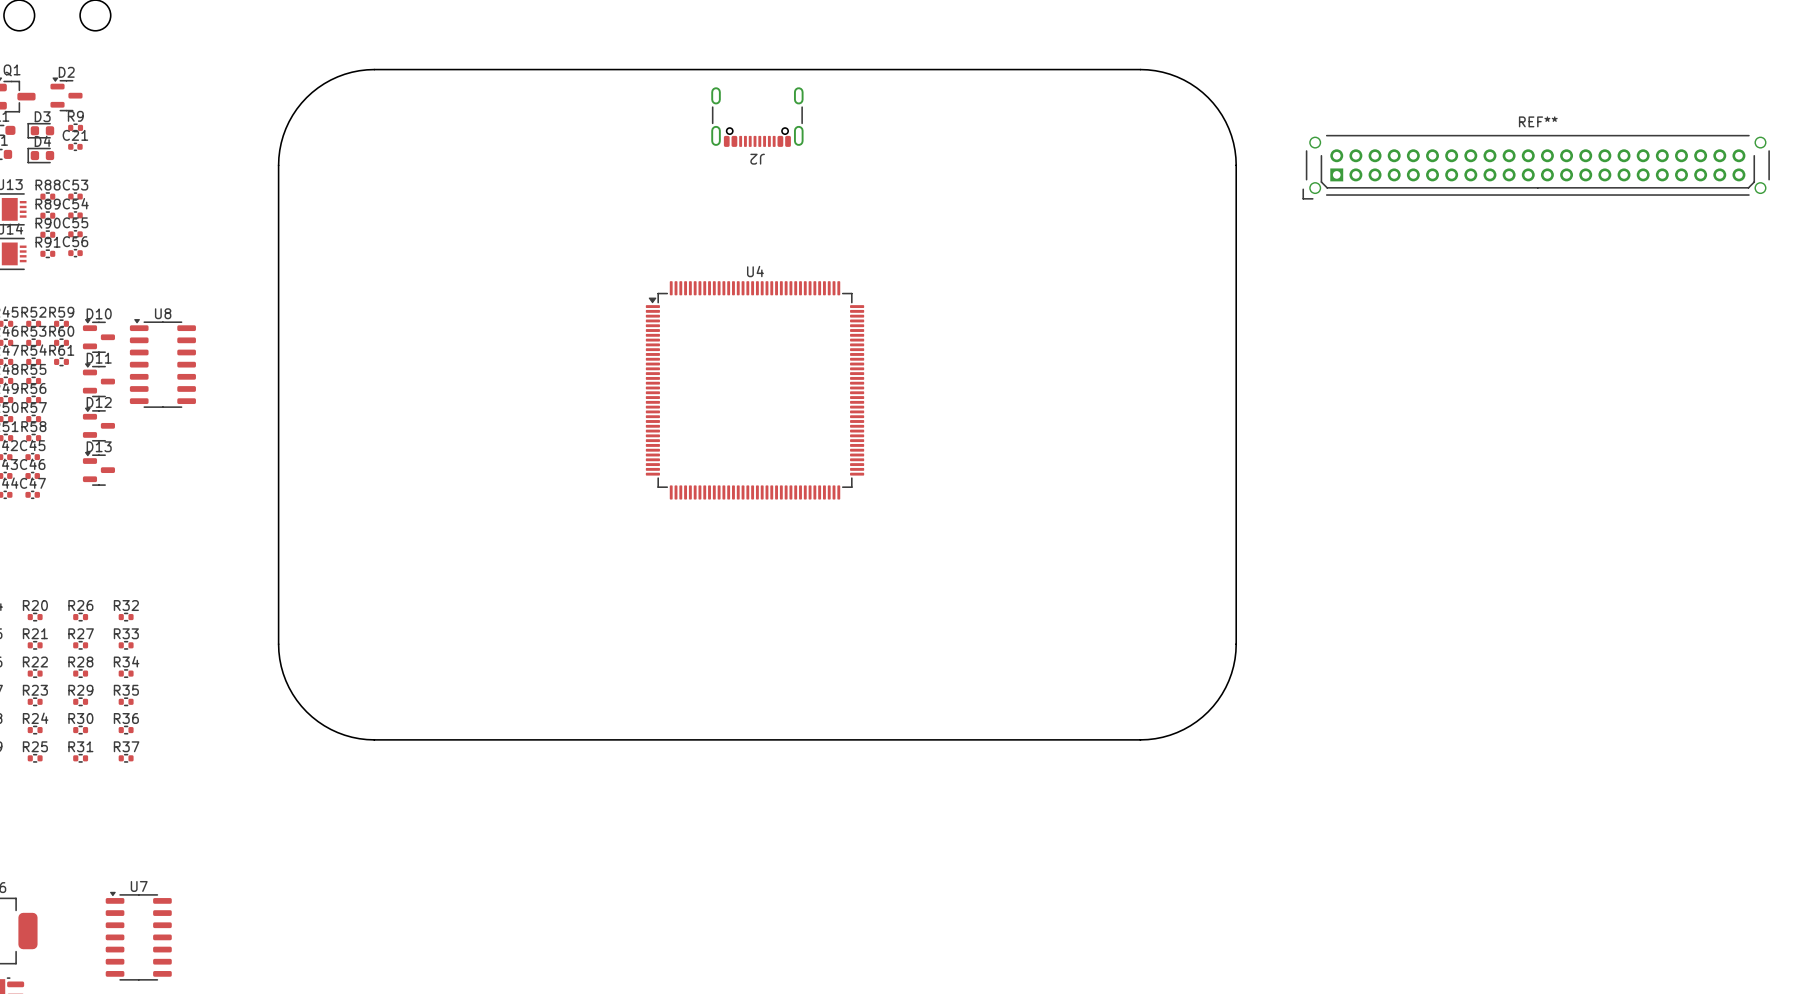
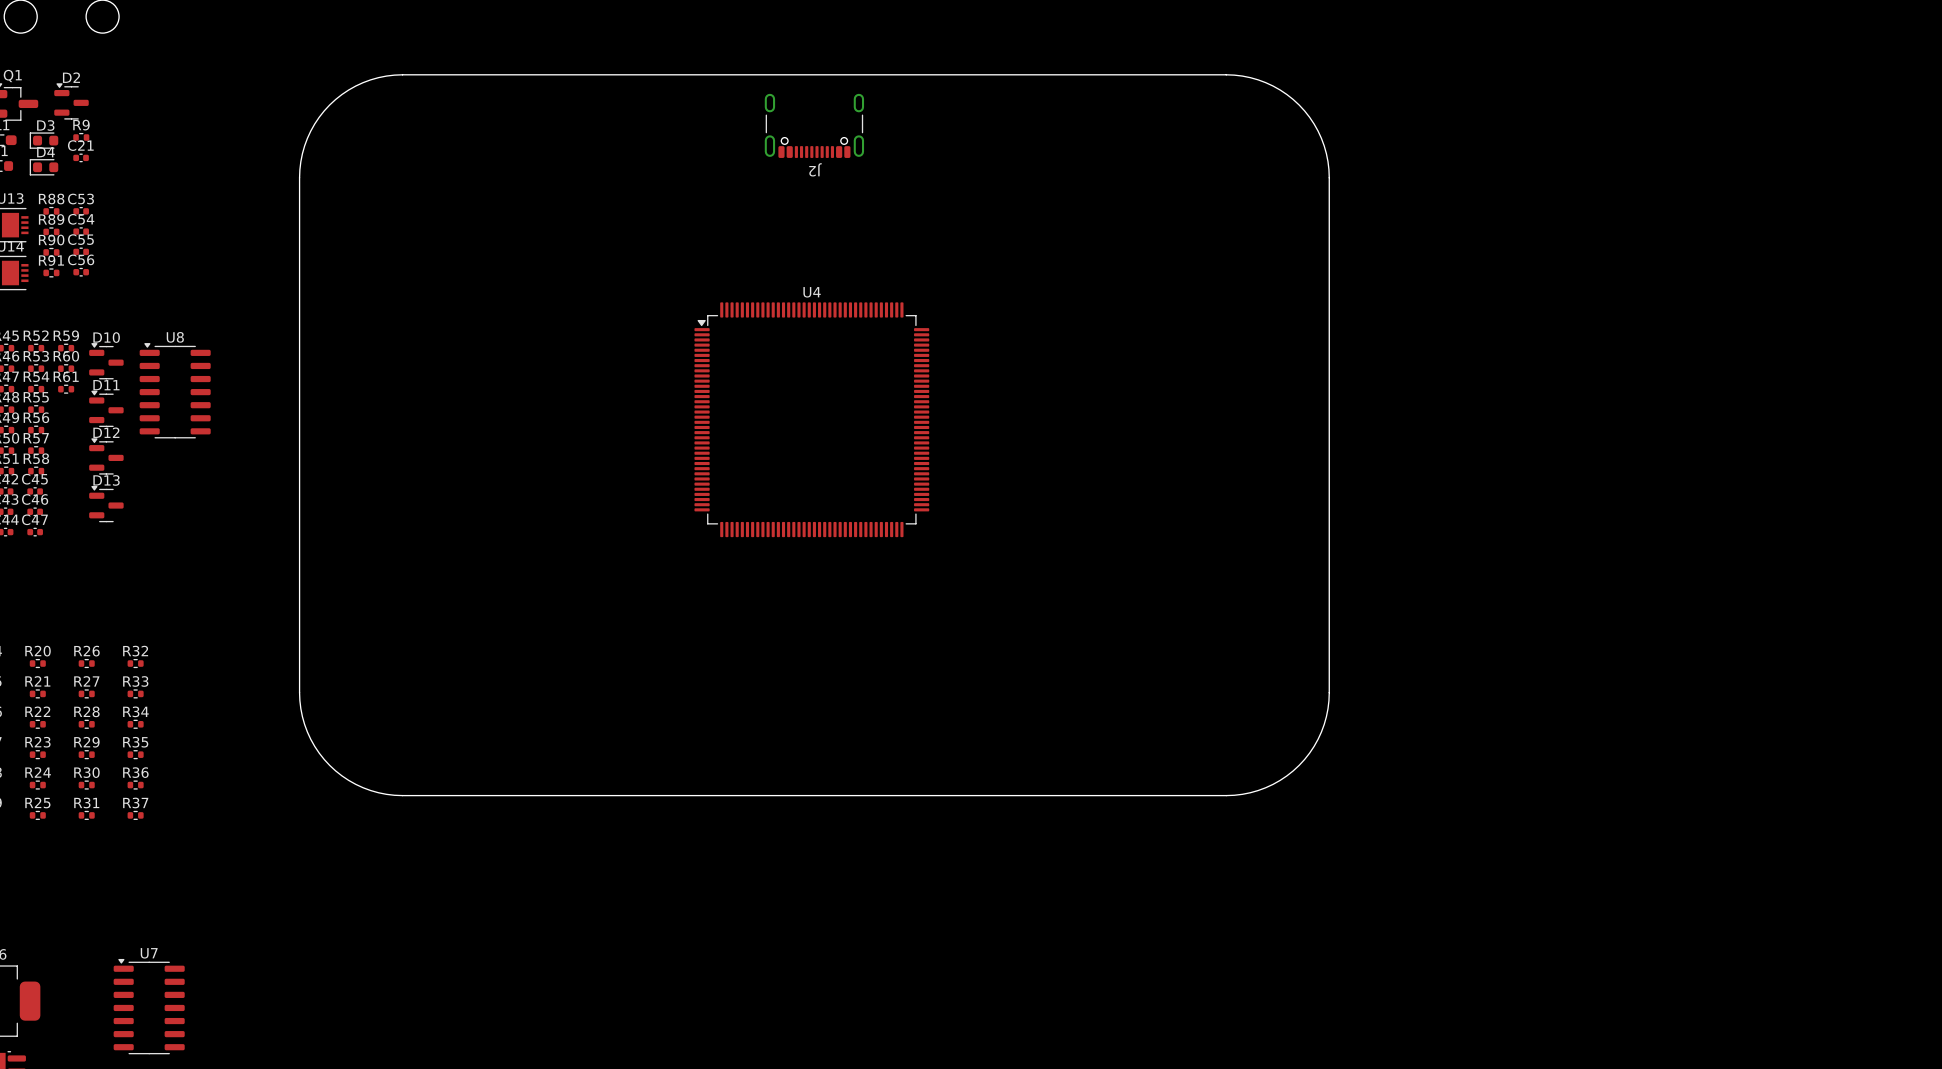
REF**: (1536, 167) -> none

